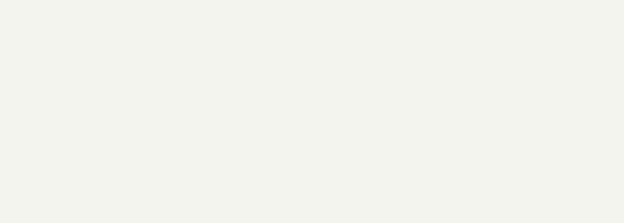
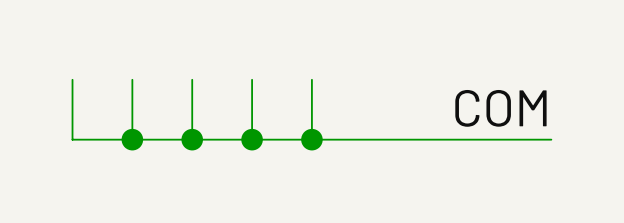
wire: none -> (72, 79) (72, 139) (551, 139)
wire: none -> (132, 79) (132, 139)
wire: none -> (192, 79) (192, 139)
wire: none -> (252, 79) (252, 139)
wire: none -> (311, 79) (311, 139)
label: none -> COM (500, 108)
junction: none -> (132, 139)
junction: none -> (192, 139)
junction: none -> (252, 139)
junction: none -> (311, 139)

